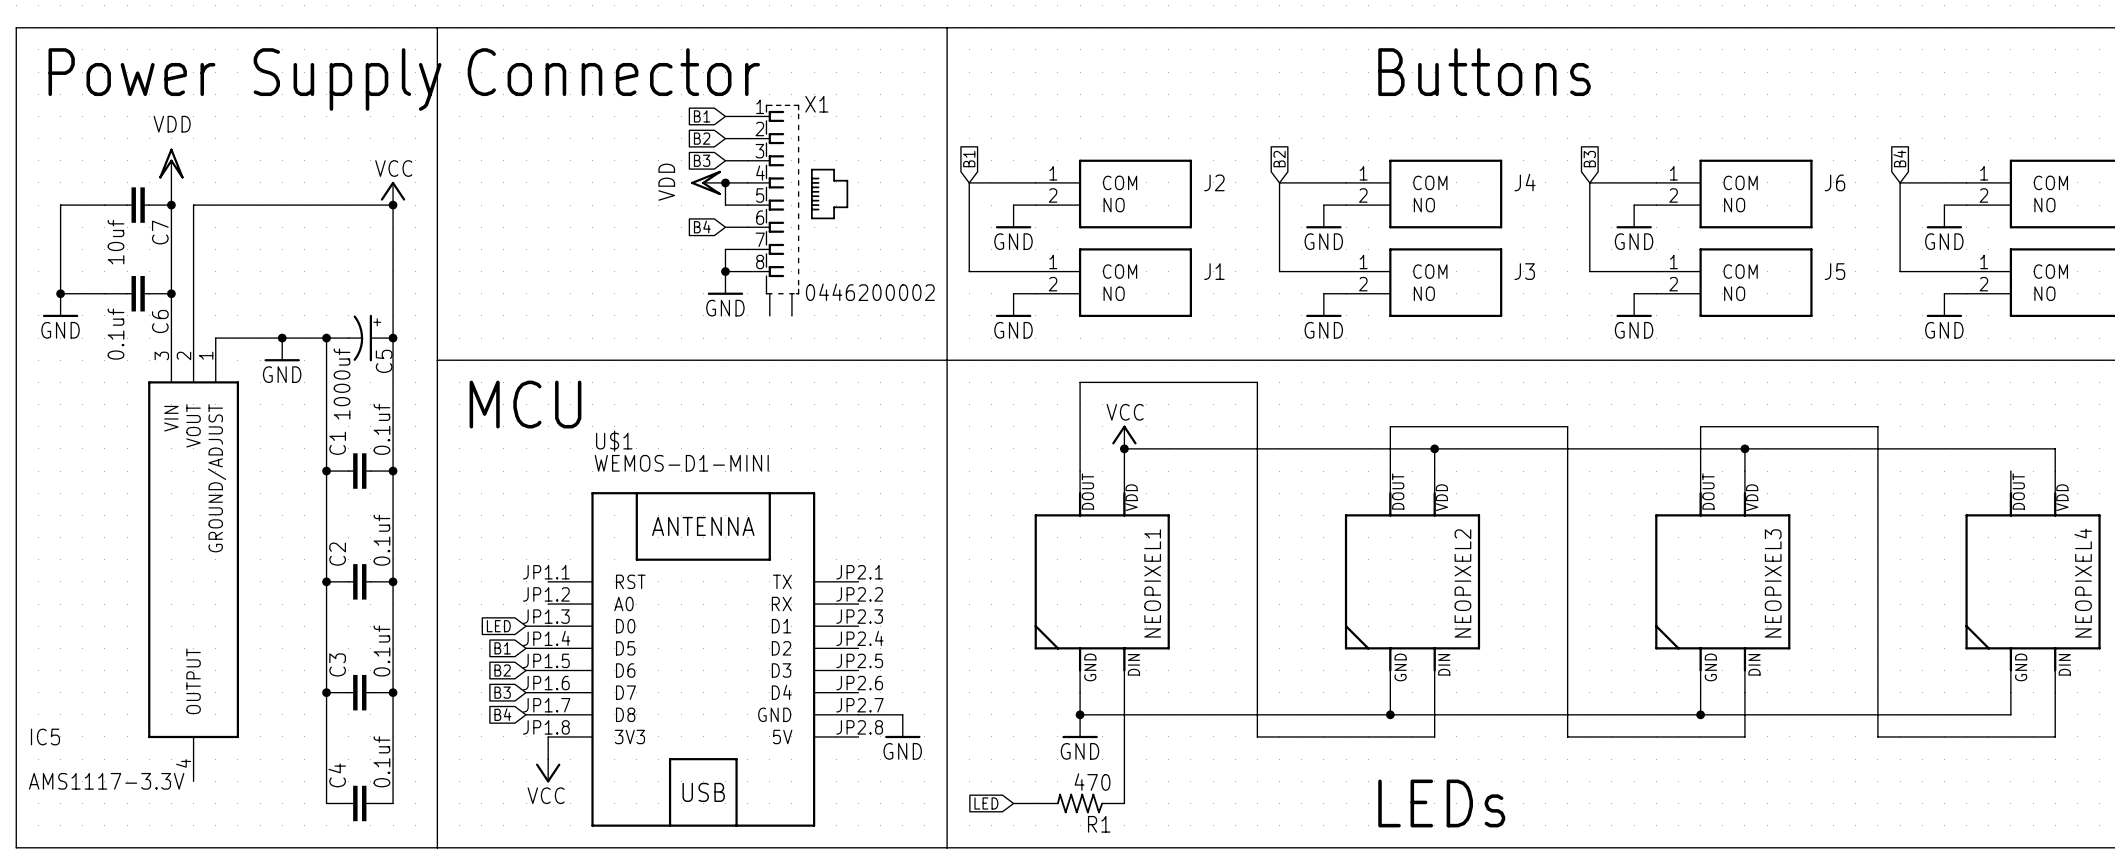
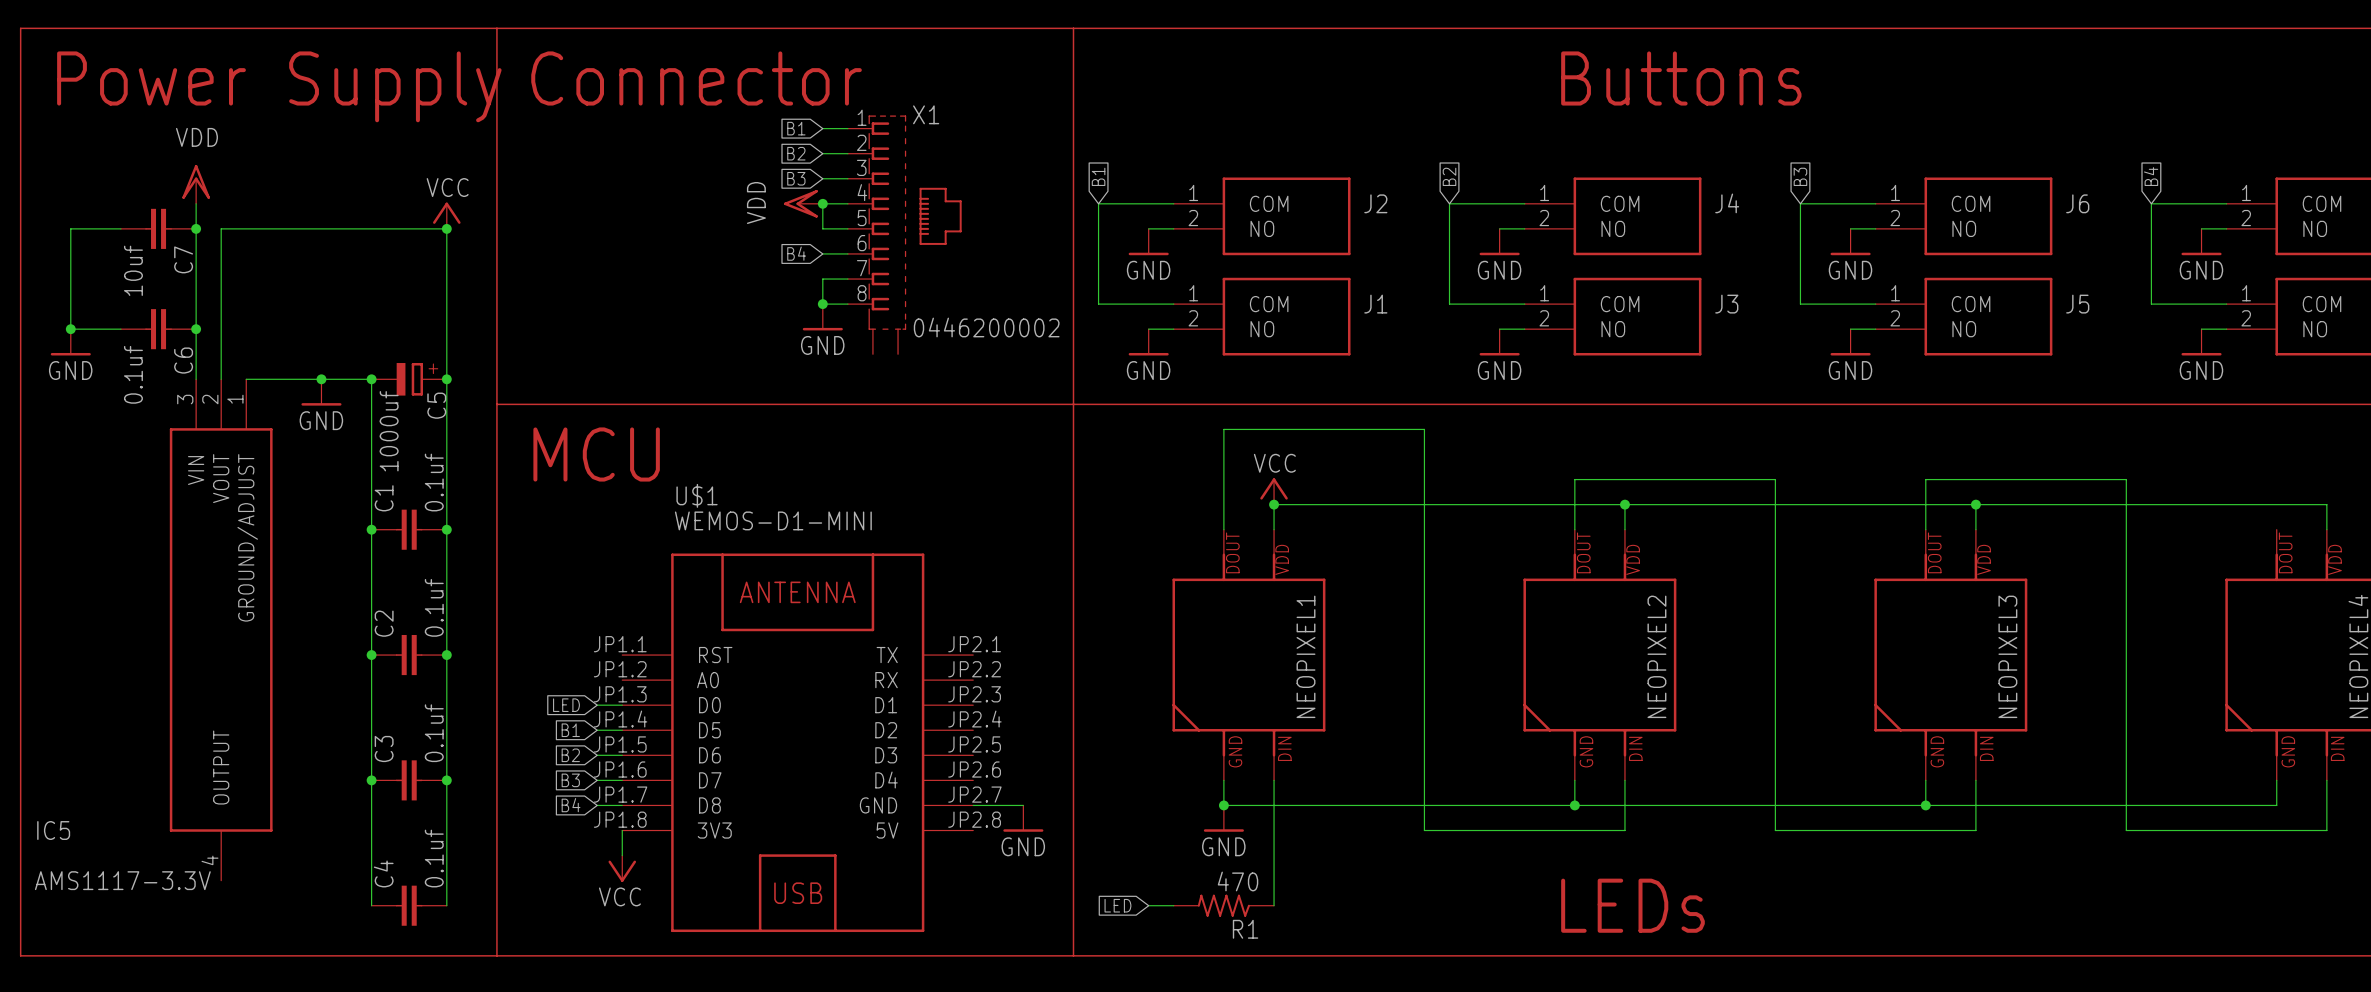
C5 symbol: [326, 314, 394, 362] -> [371, 363, 447, 396]

